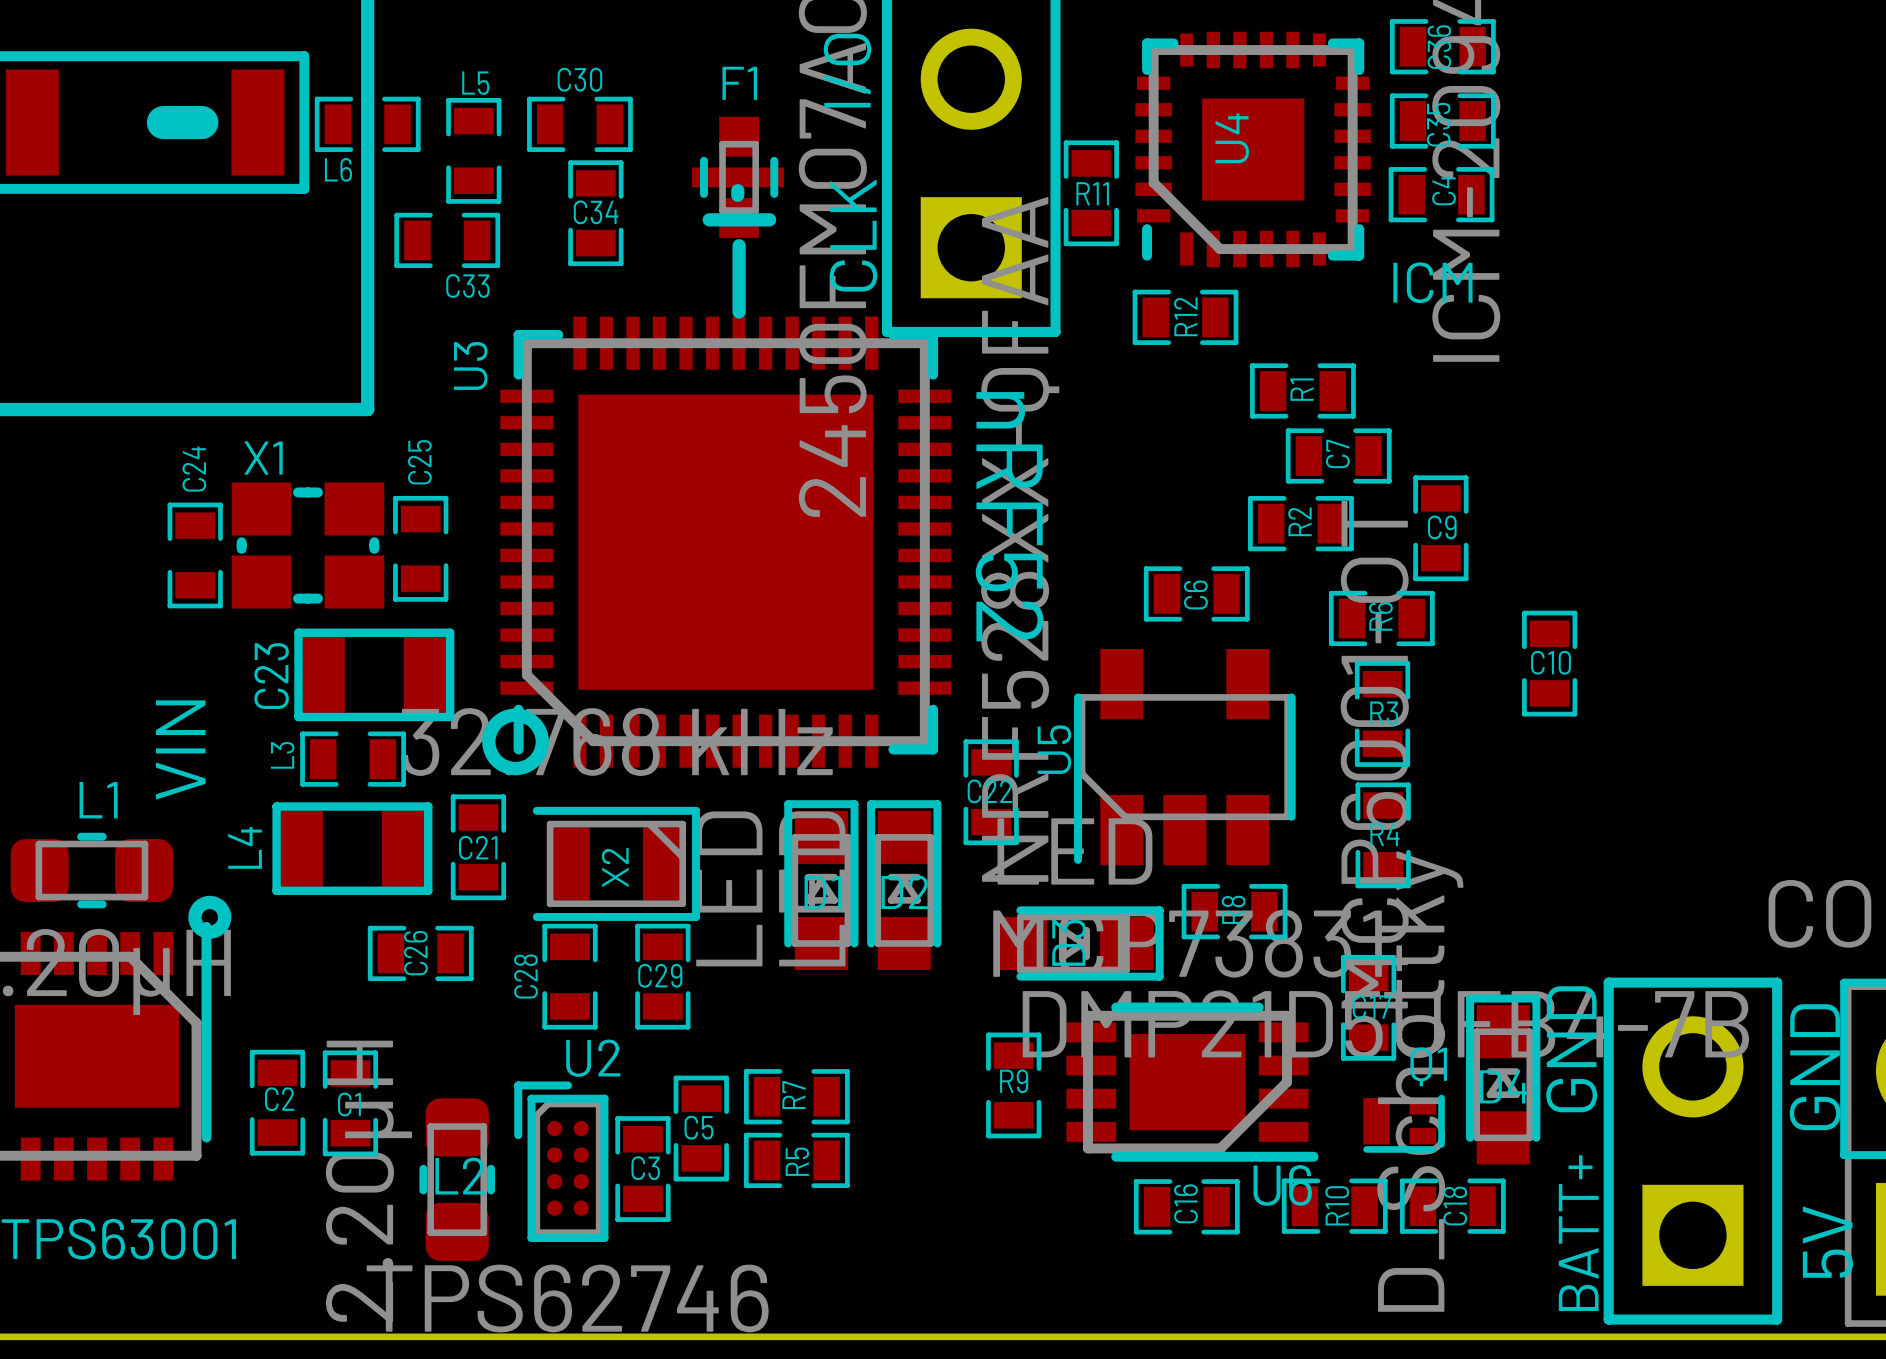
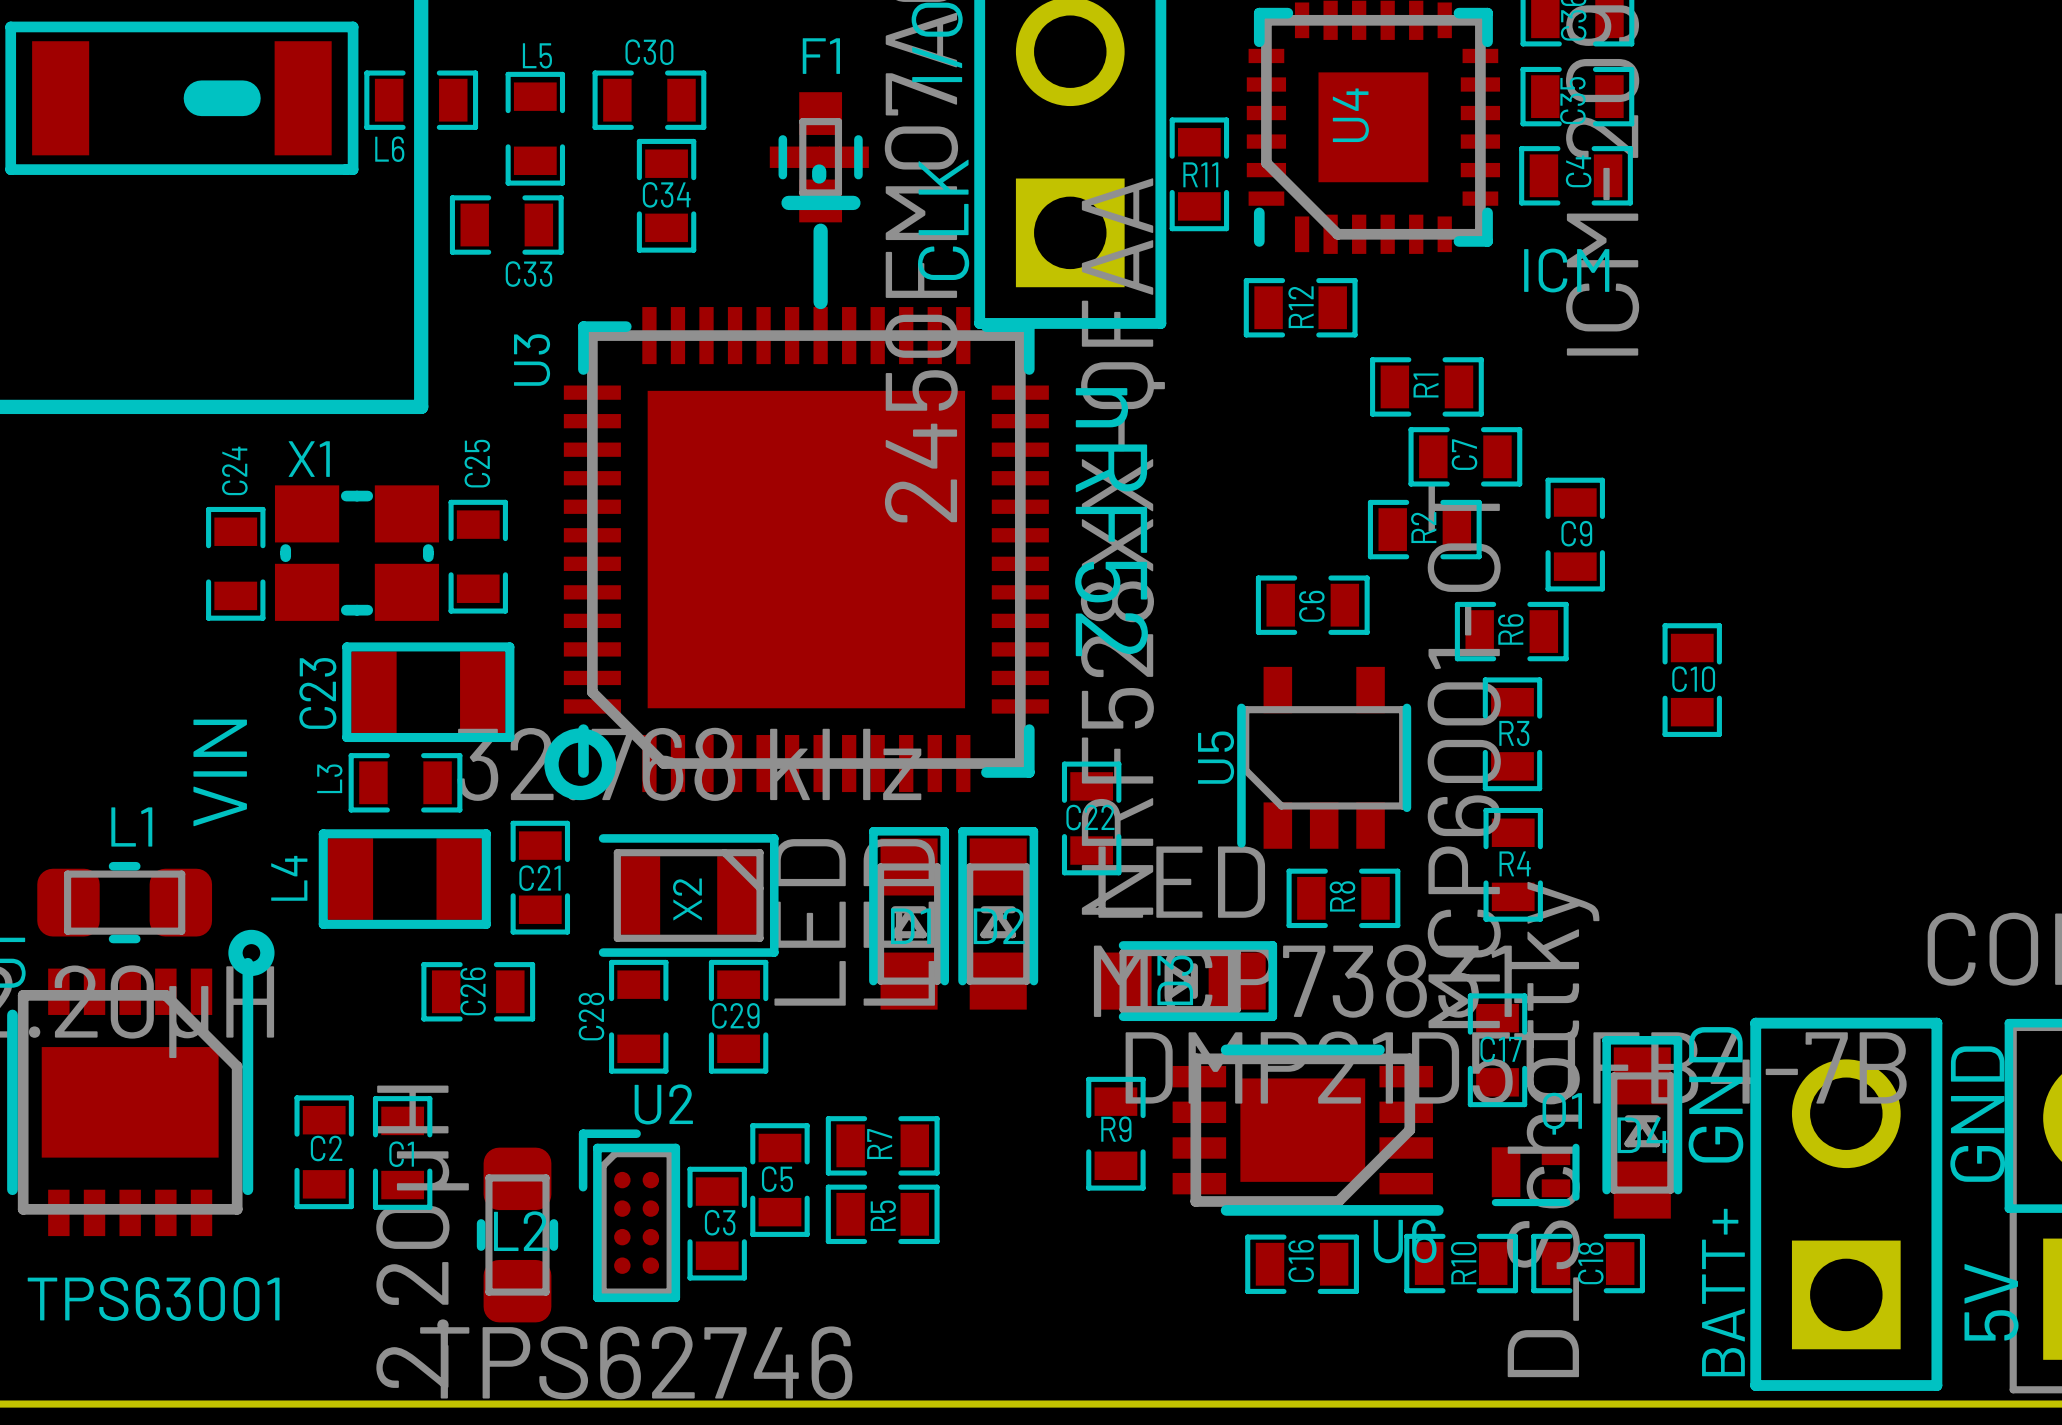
U5 footprint: [1074, 648, 1296, 866] -> [1237, 666, 1412, 849]
R8 position: (1234, 911) -> (1343, 898)

